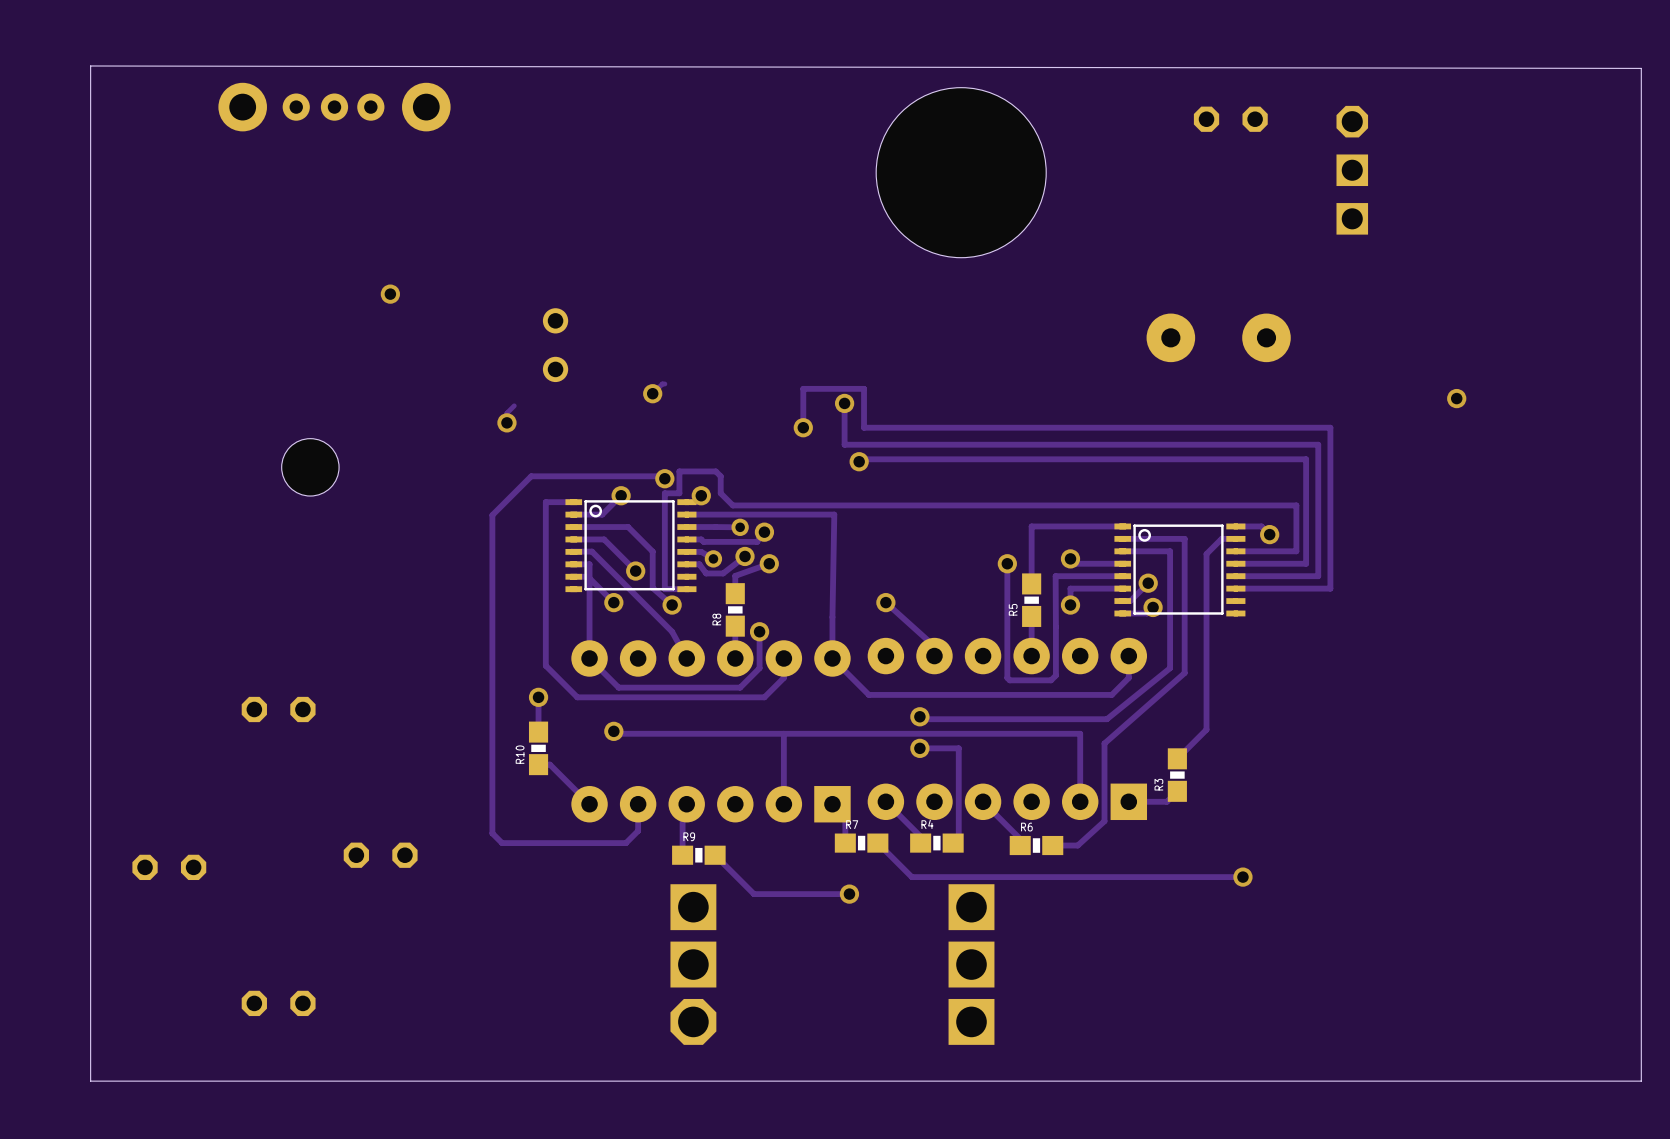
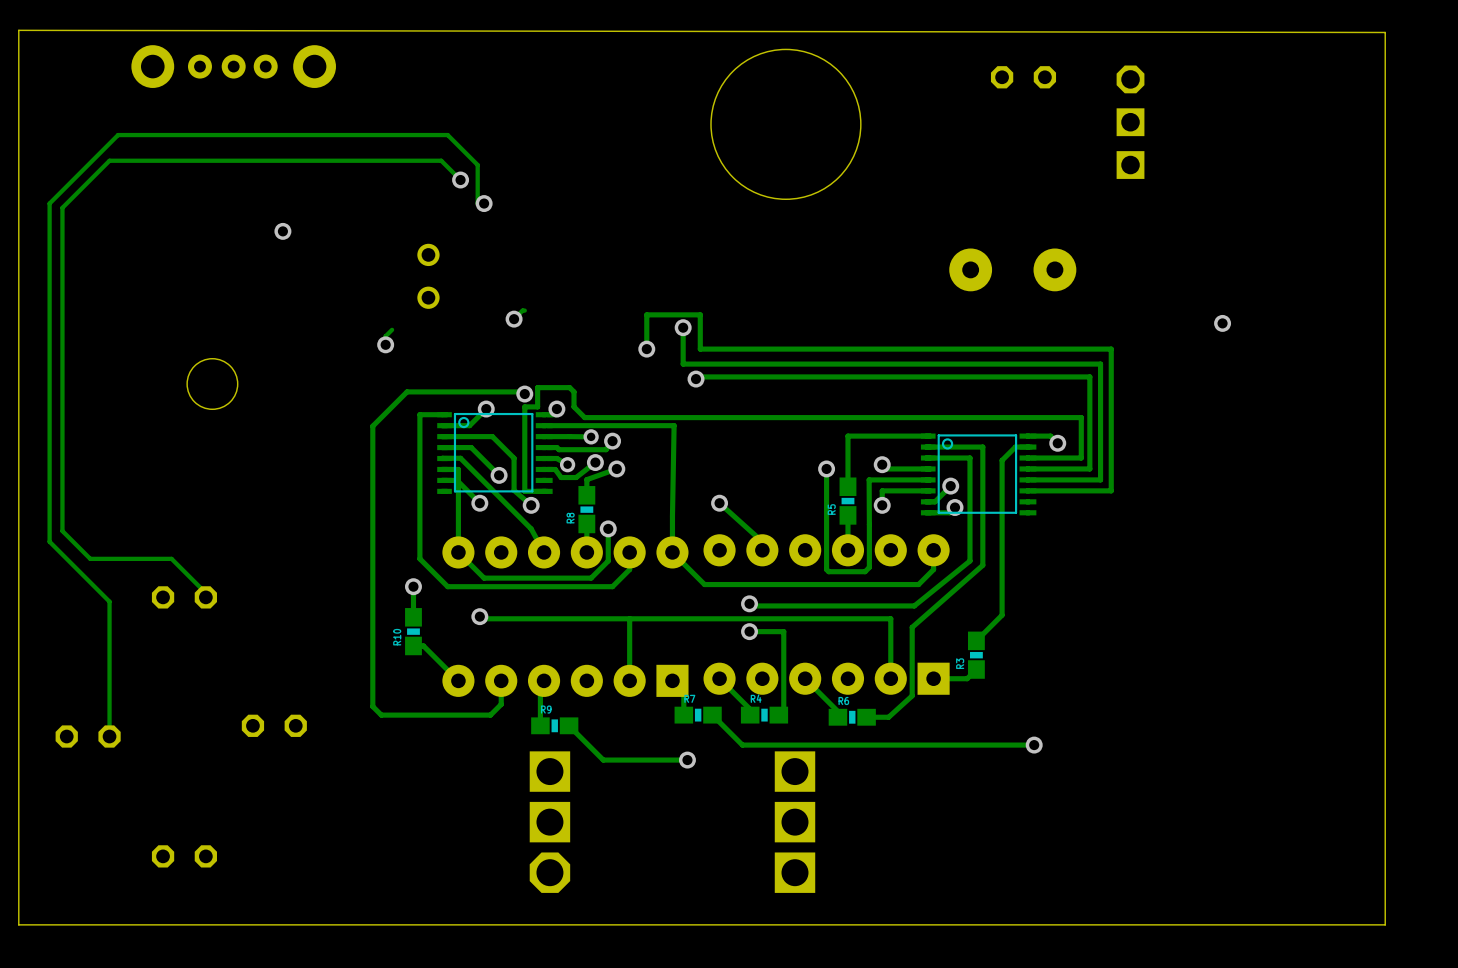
track: none -> (460, 180) (441, 160) (109, 160) (62, 207) (62, 531) (90, 558) (171, 558) (205, 593) (205, 597)
via: none -> (460, 180)
track: none -> (484, 203) (477, 203) (477, 165) (447, 135) (118, 135) (49, 203) (49, 541) (109, 601) (109, 736)
via: none -> (484, 203)

